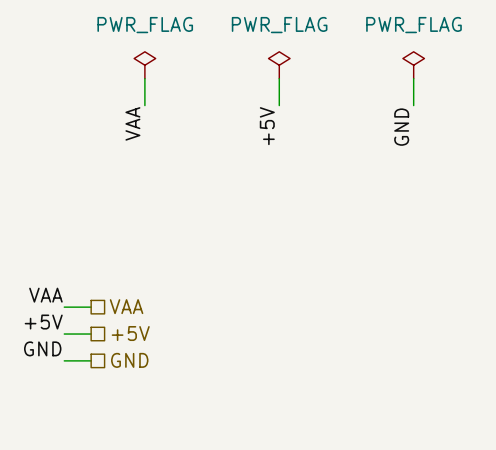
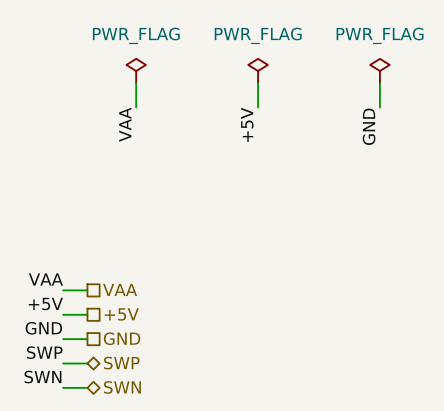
label: none -> SWP (44, 352)
wire: none -> (63, 363) (87, 363)
hierarchical label: none -> SWP (121, 363)
label: none -> SWN (42, 377)
wire: none -> (63, 387) (87, 387)
hierarchical label: none -> SWN (122, 387)

